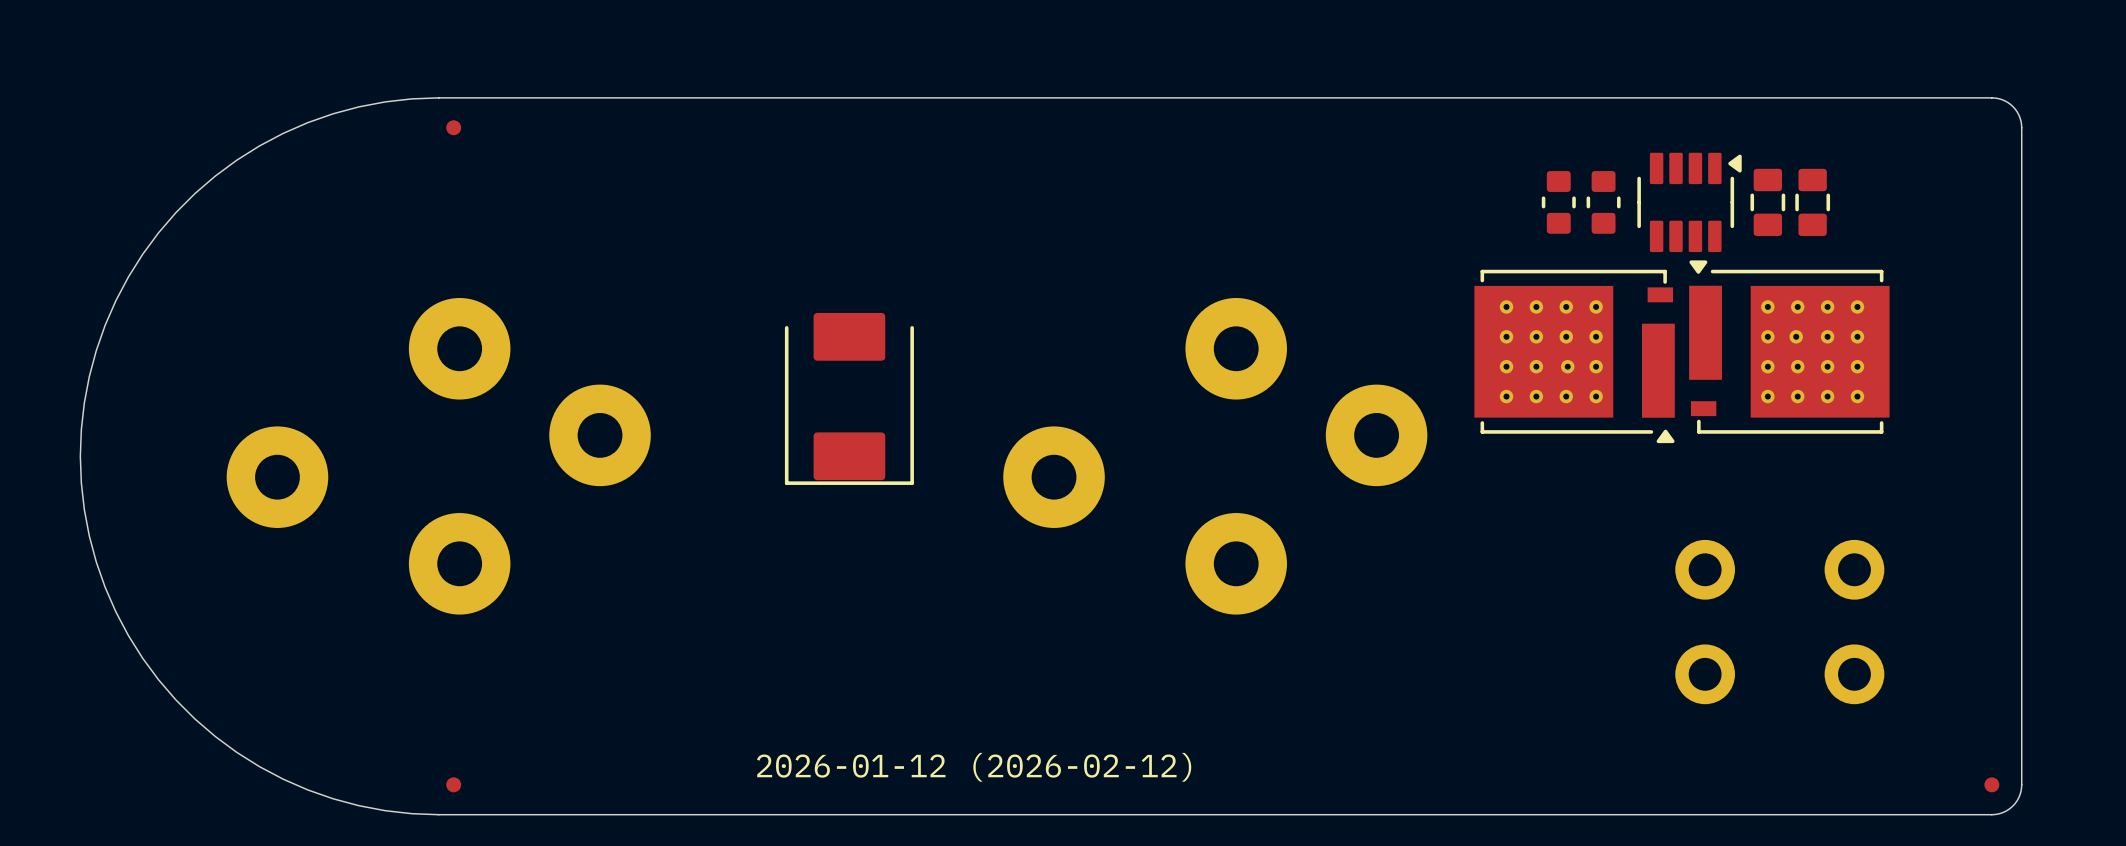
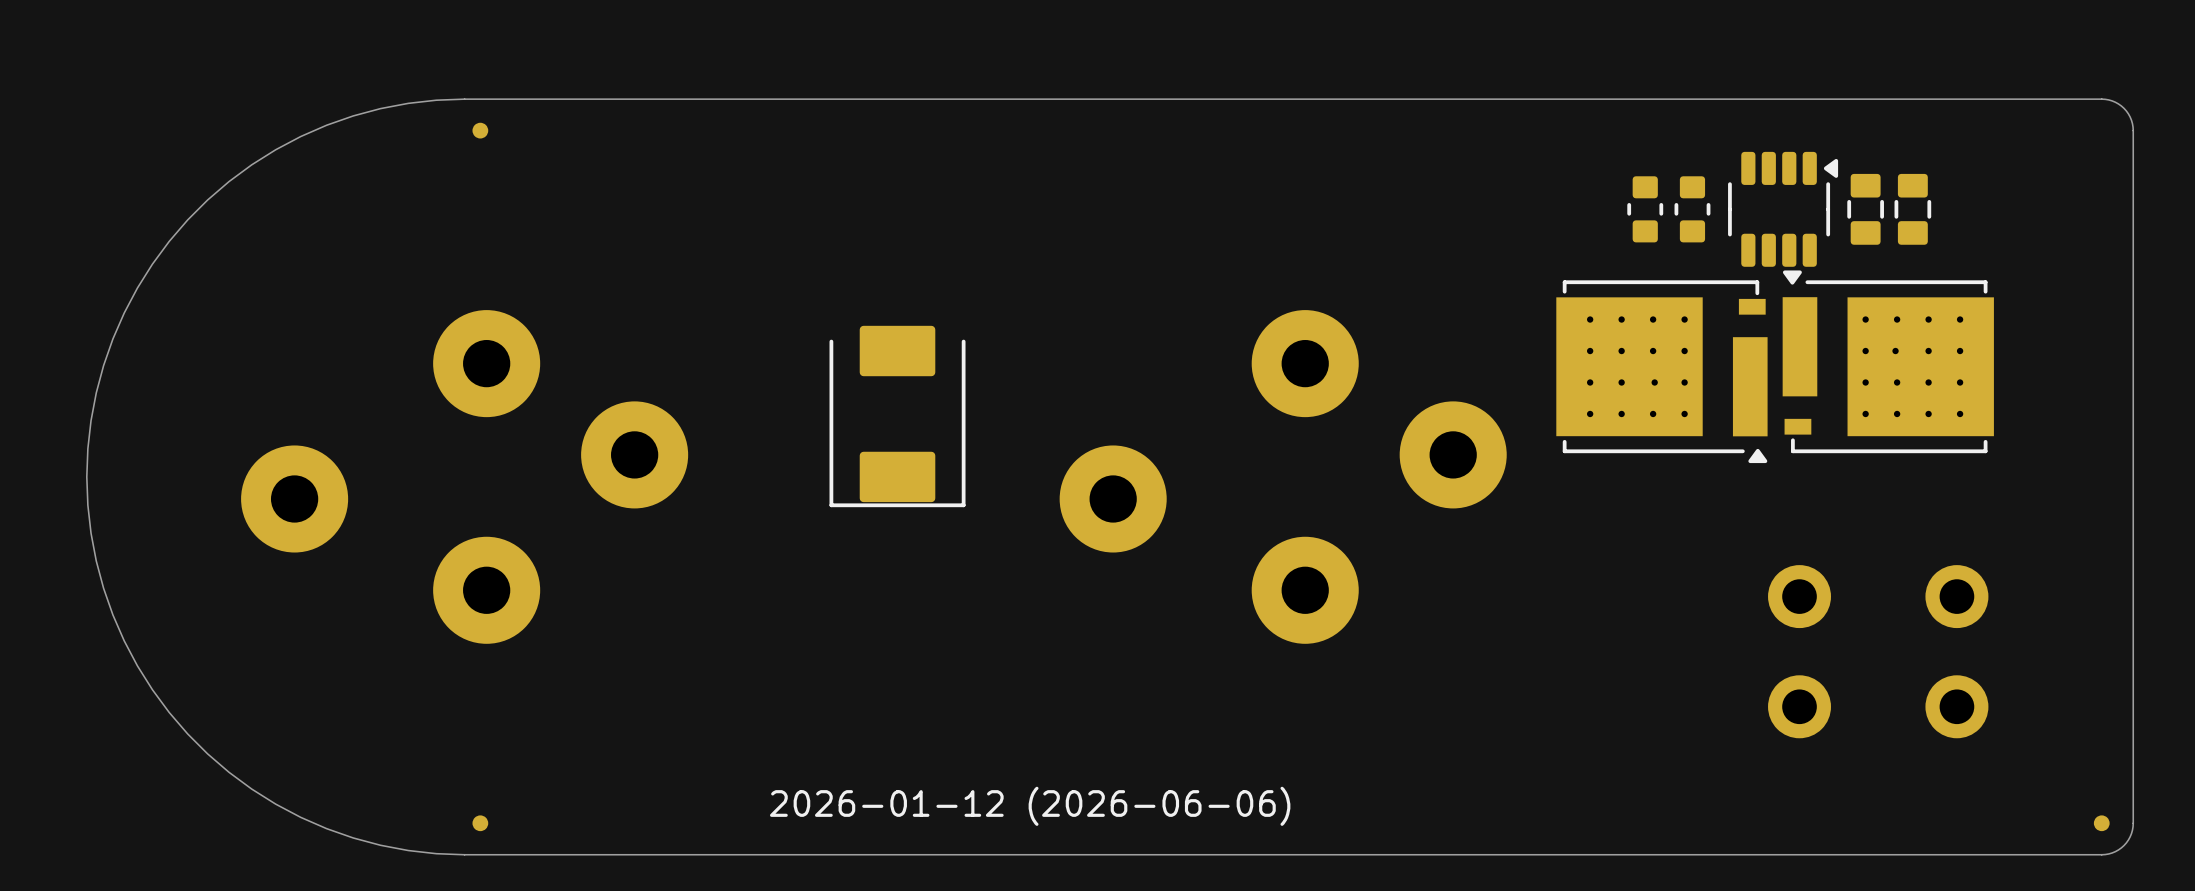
part footprint: [1637, 152, 1742, 253] -> [1728, 151, 1839, 267]
drawing shape: [757, 752, 1192, 782] -> [770, 786, 1291, 826]

